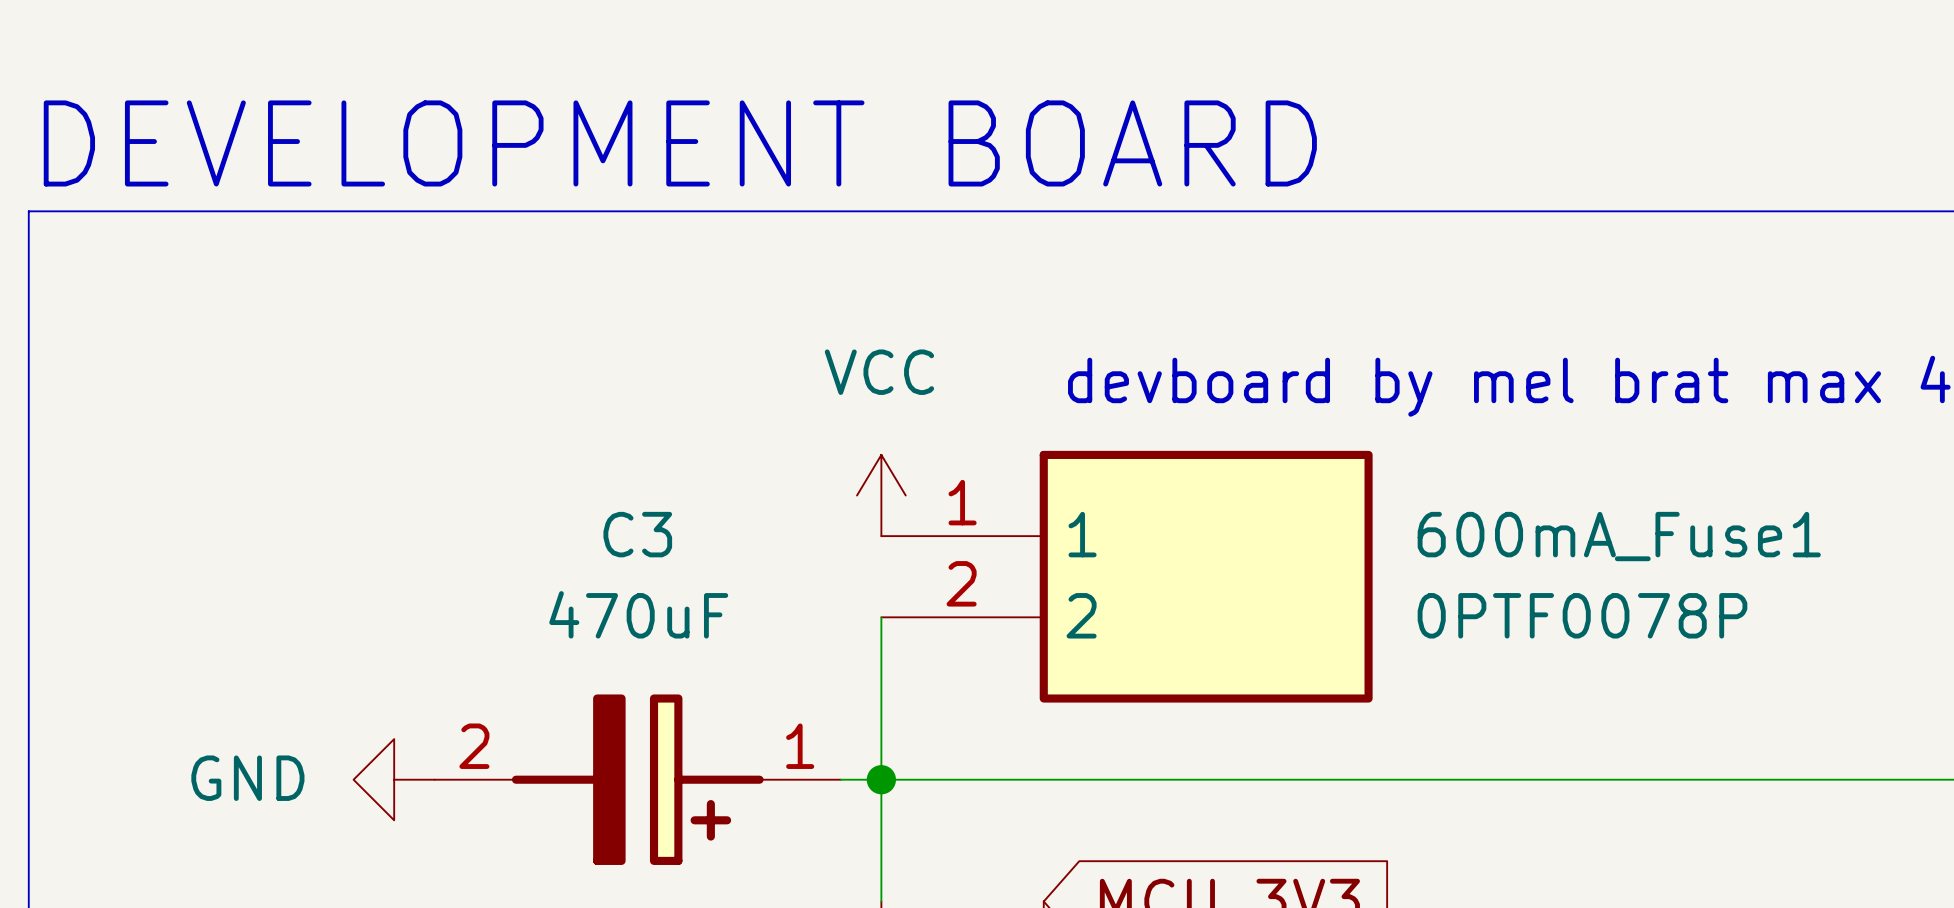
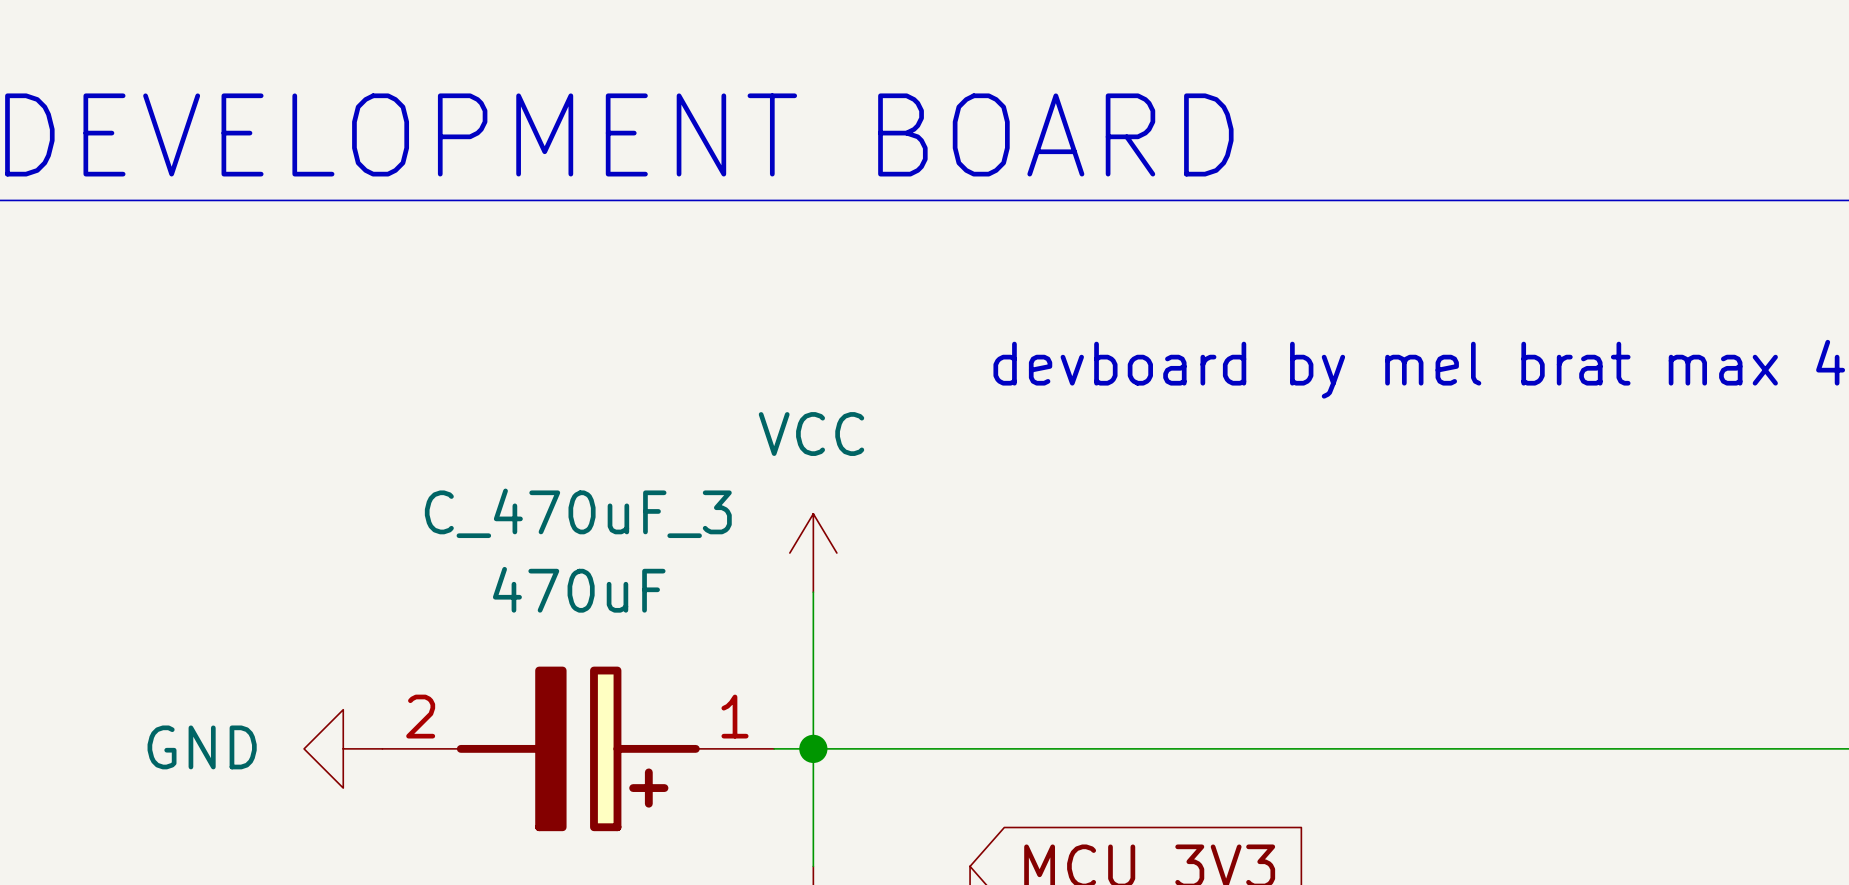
power symbol position: VCC (881, 495) -> VCC (813, 553)
C3 name: C3 (637, 534) -> C_470uF_3 (578, 513)
600mA_Fuse1: 0PTF0078P (1127, 576) -> none

